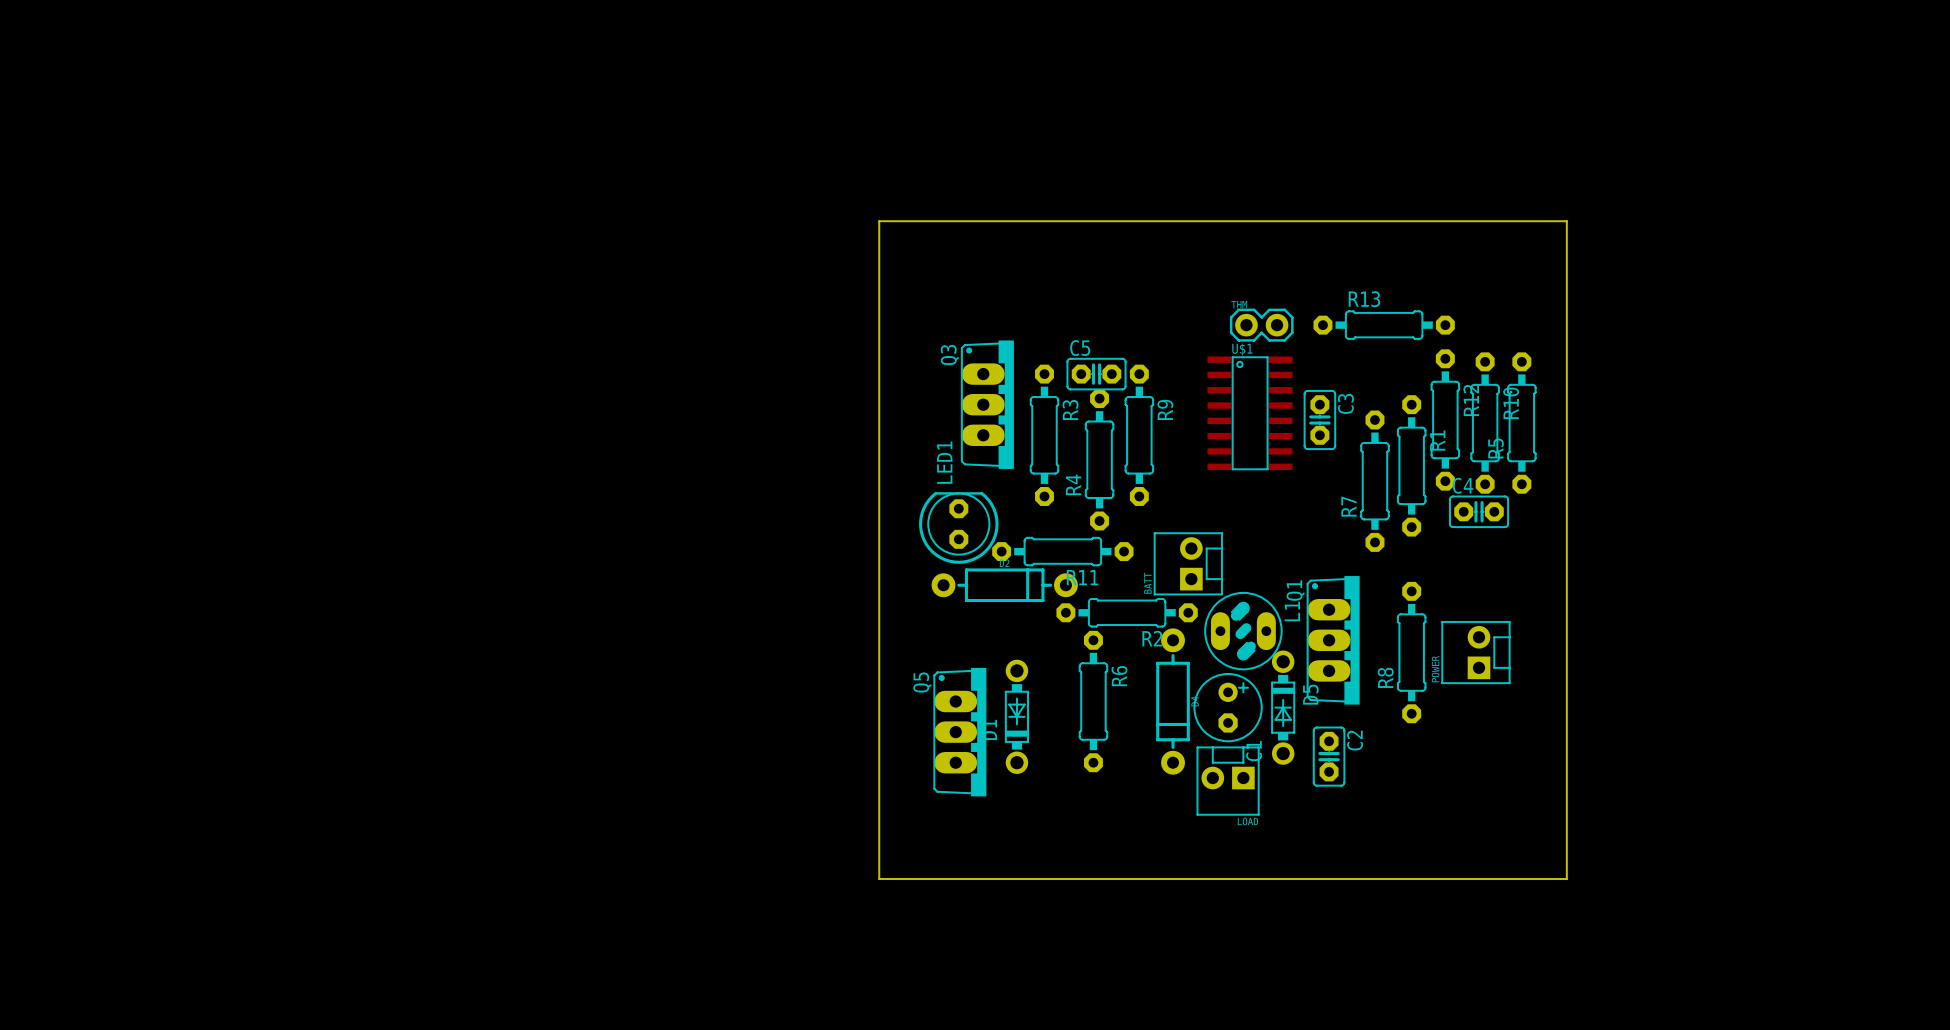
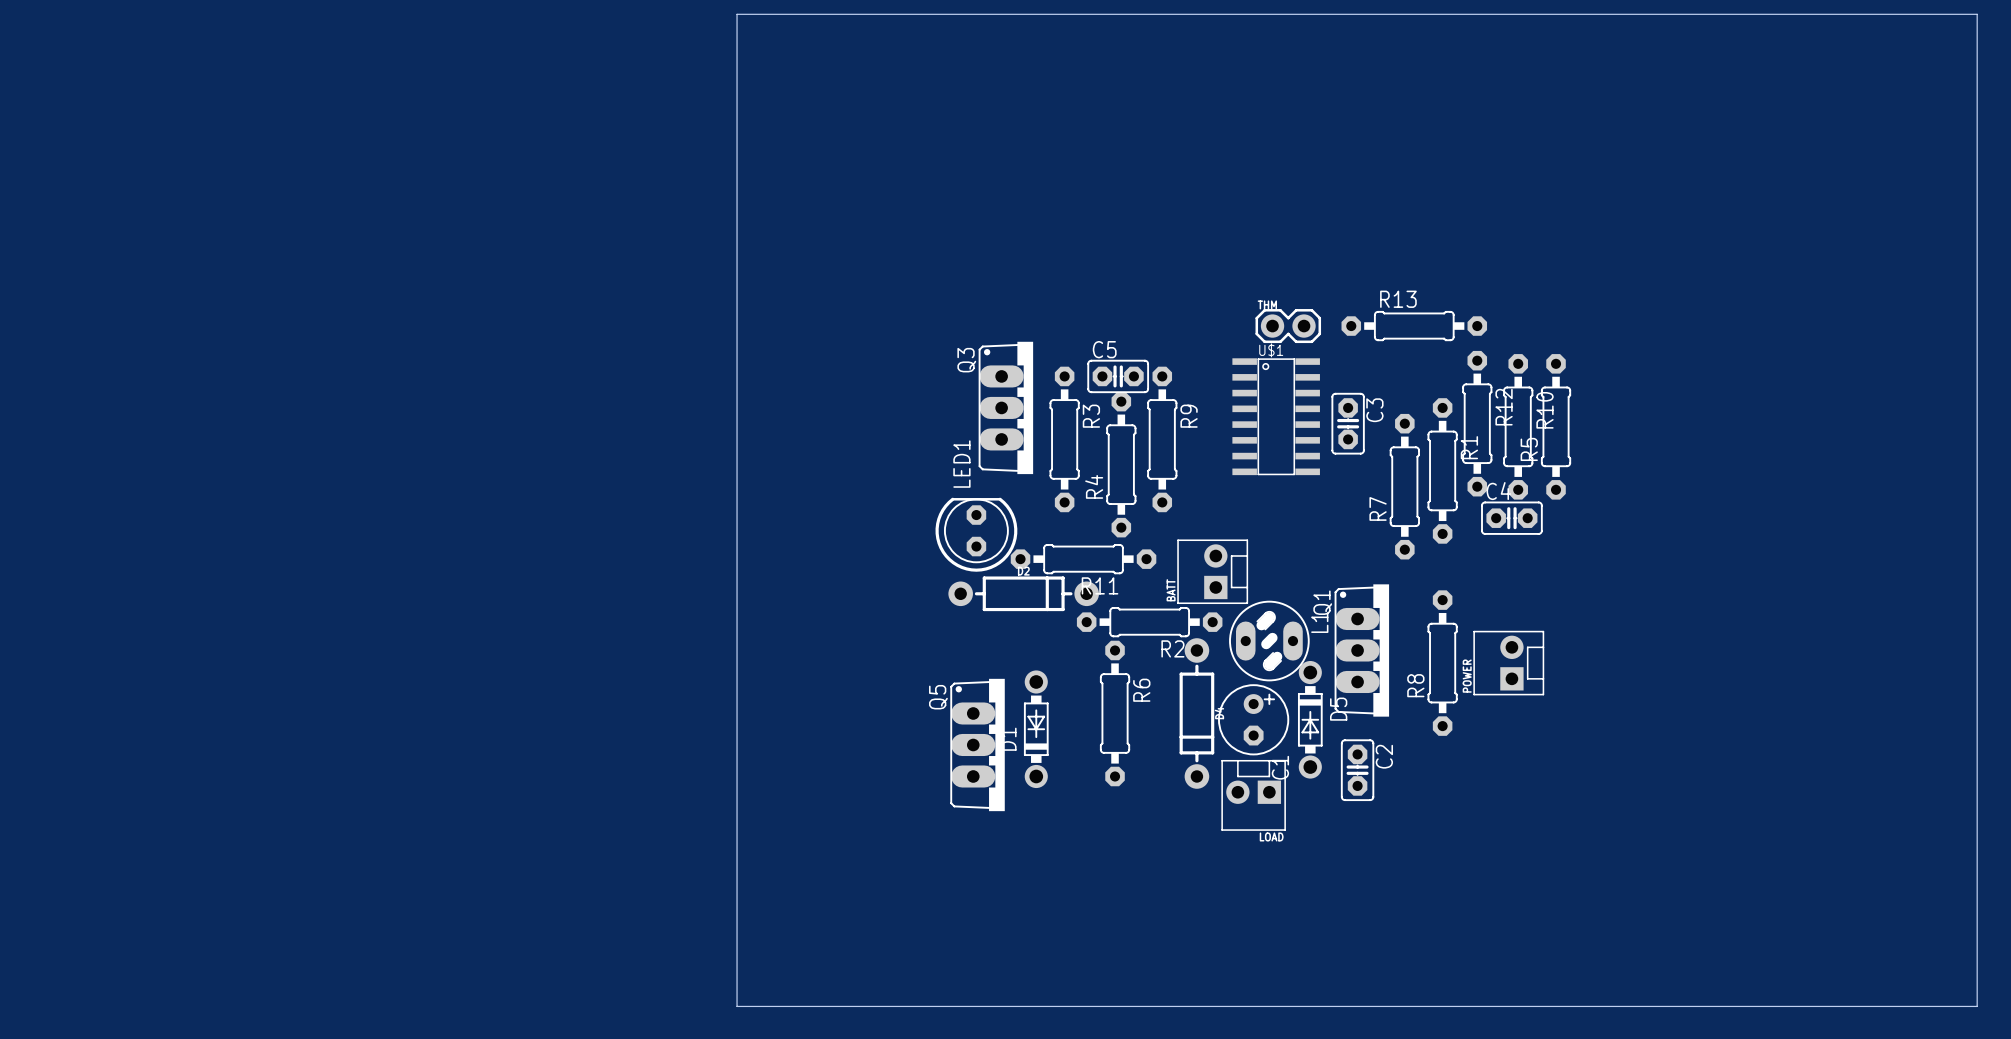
board edge: none -> (737, 14) (1977, 14) (1977, 1006) (737, 1006) (737, 14)
board edge: (879, 221) (1566, 221) (1566, 878) (879, 878) (879, 221) -> none

